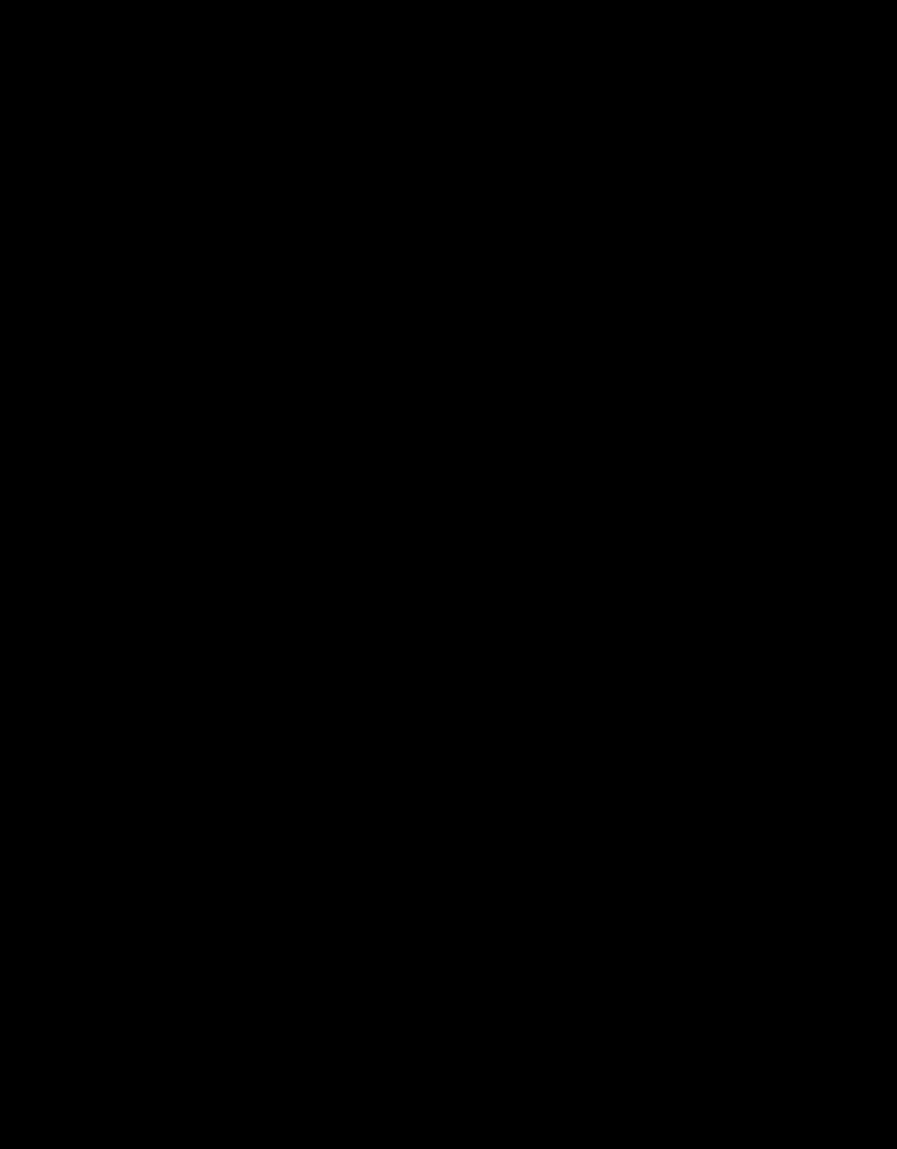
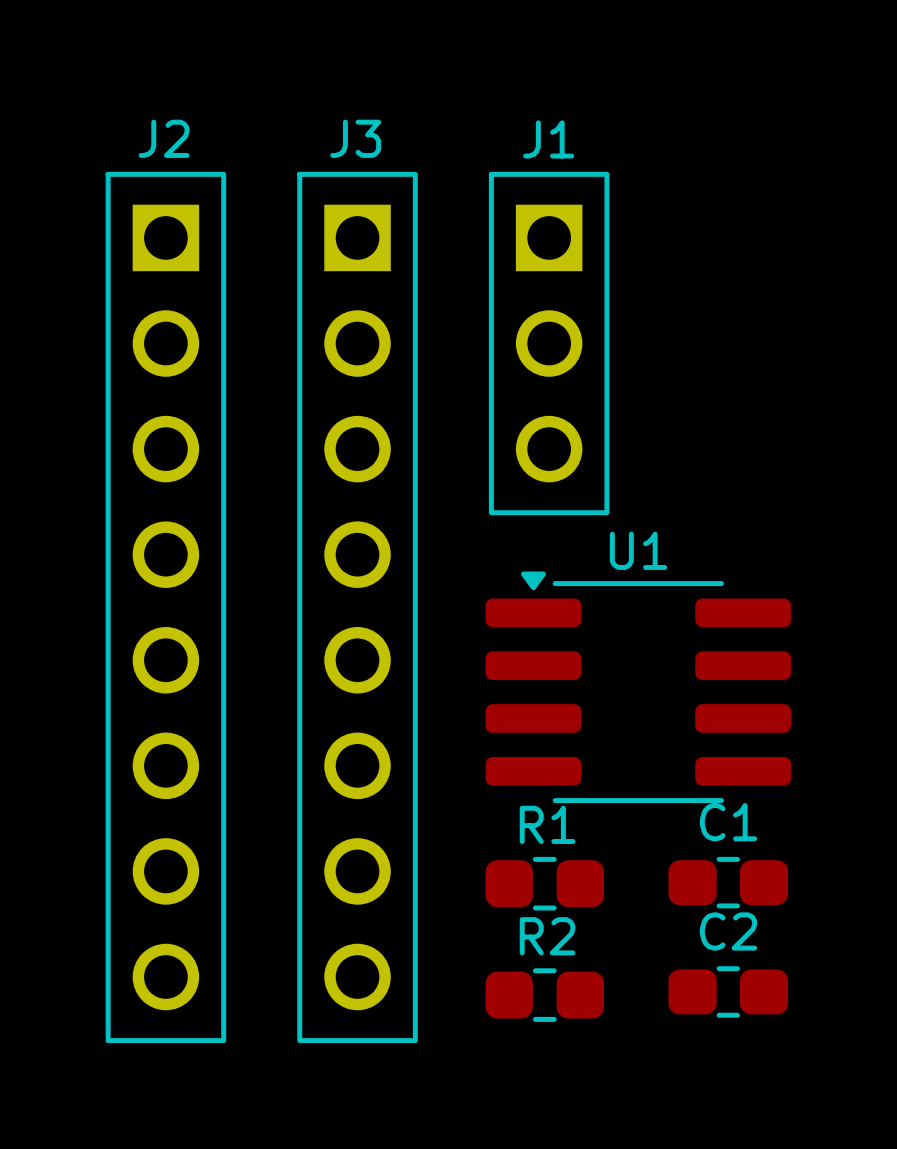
J1: none -> (549, 343)
J2: none -> (165, 607)
J3: none -> (357, 607)
U1: none -> (638, 687)
C1: none -> (728, 882)
R1: none -> (544, 883)
C2: none -> (728, 991)
R2: none -> (544, 995)

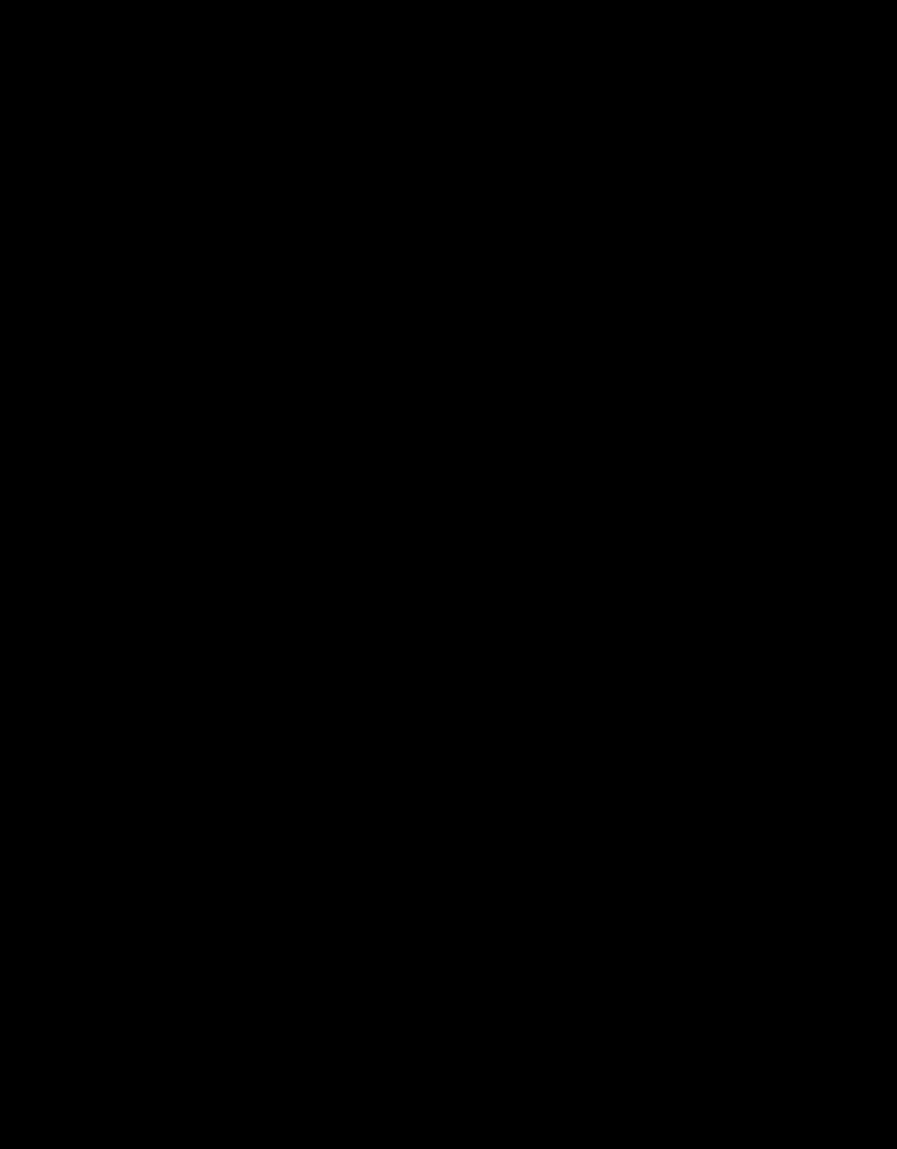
J1: (549, 343) -> none
J2: (165, 607) -> none
J3: (357, 607) -> none
U1: (638, 687) -> none
C1: (728, 882) -> none
R1: (544, 883) -> none
C2: (728, 991) -> none
R2: (544, 995) -> none

